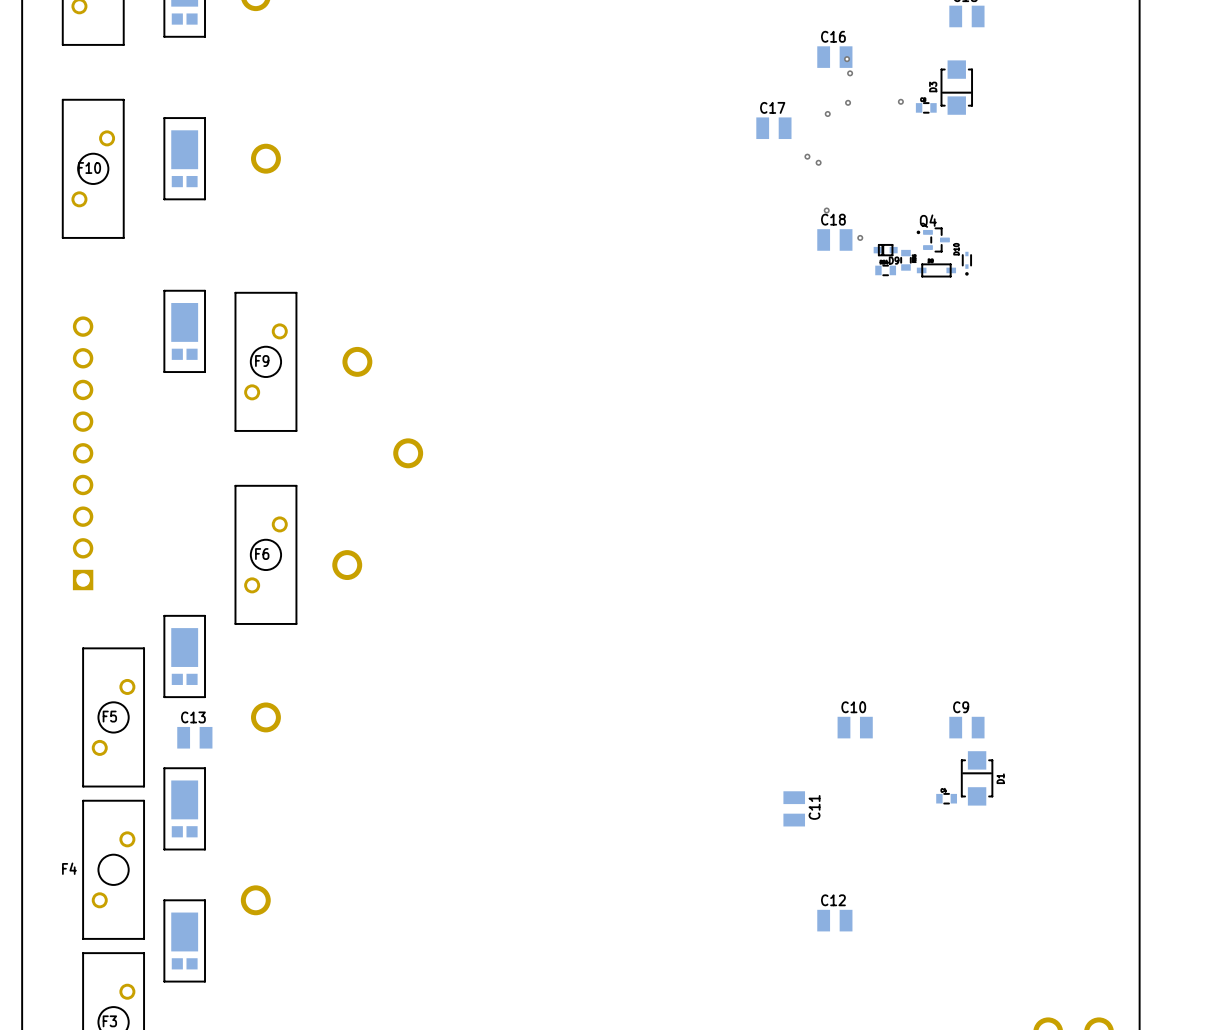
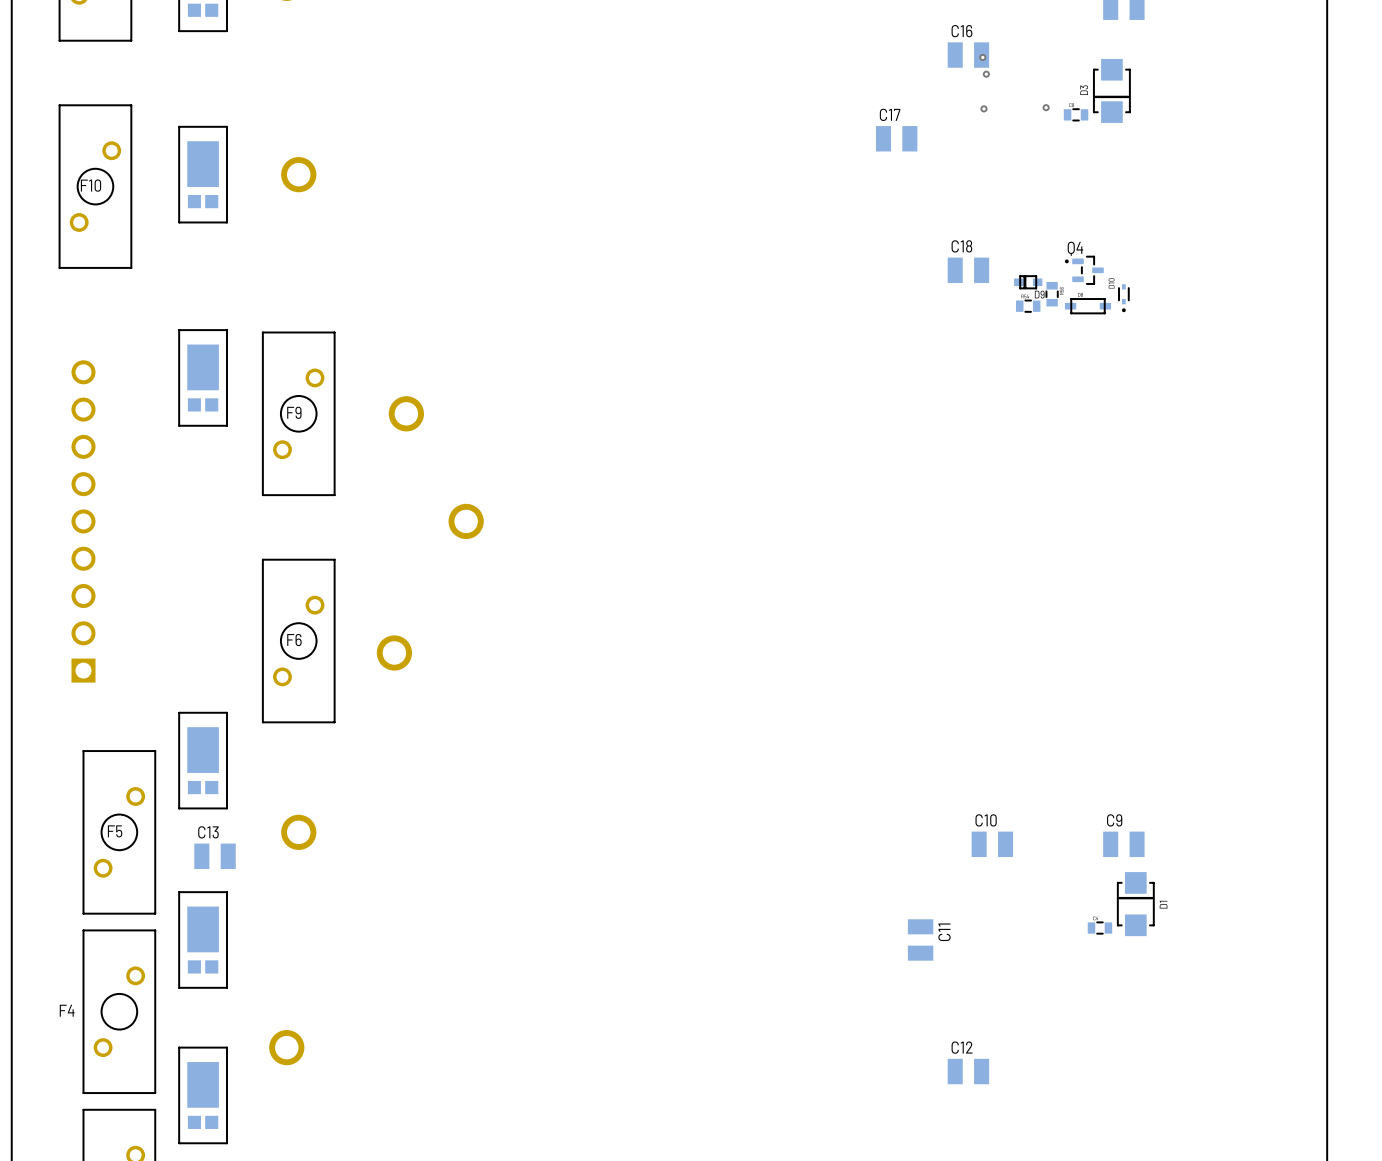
via: (827, 114) -> none
via: (807, 156) -> none
via: (818, 162) -> none
via: (826, 210) -> none
via: (860, 237) -> none

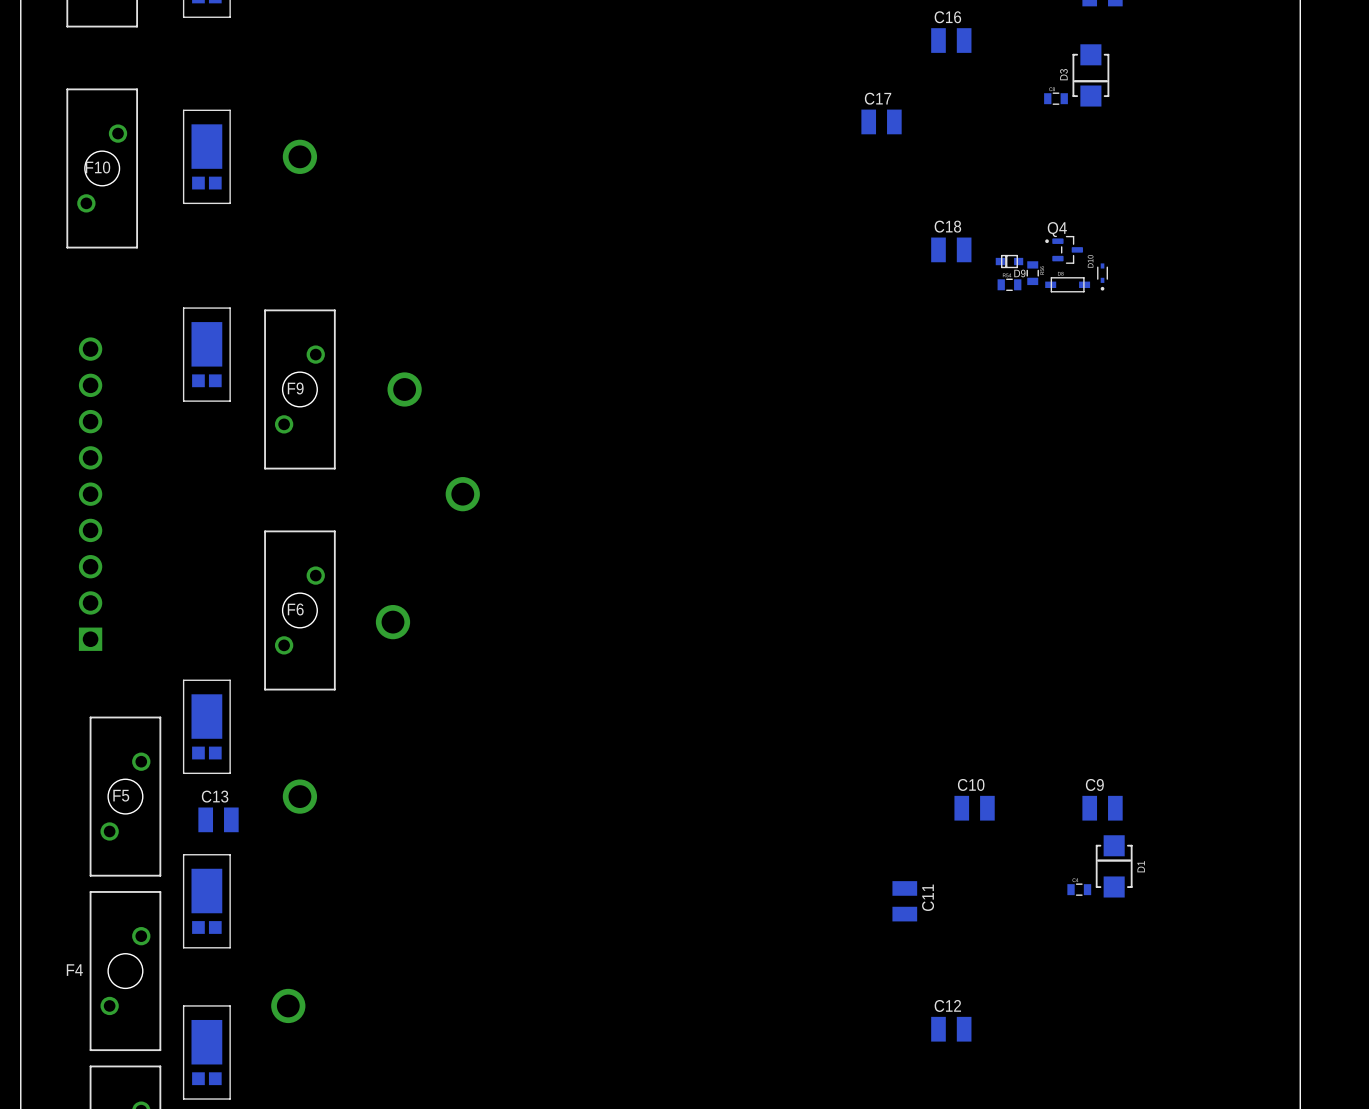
via: (982, 57) -> none
via: (986, 74) -> none
via: (1046, 107) -> none
via: (983, 108) -> none

